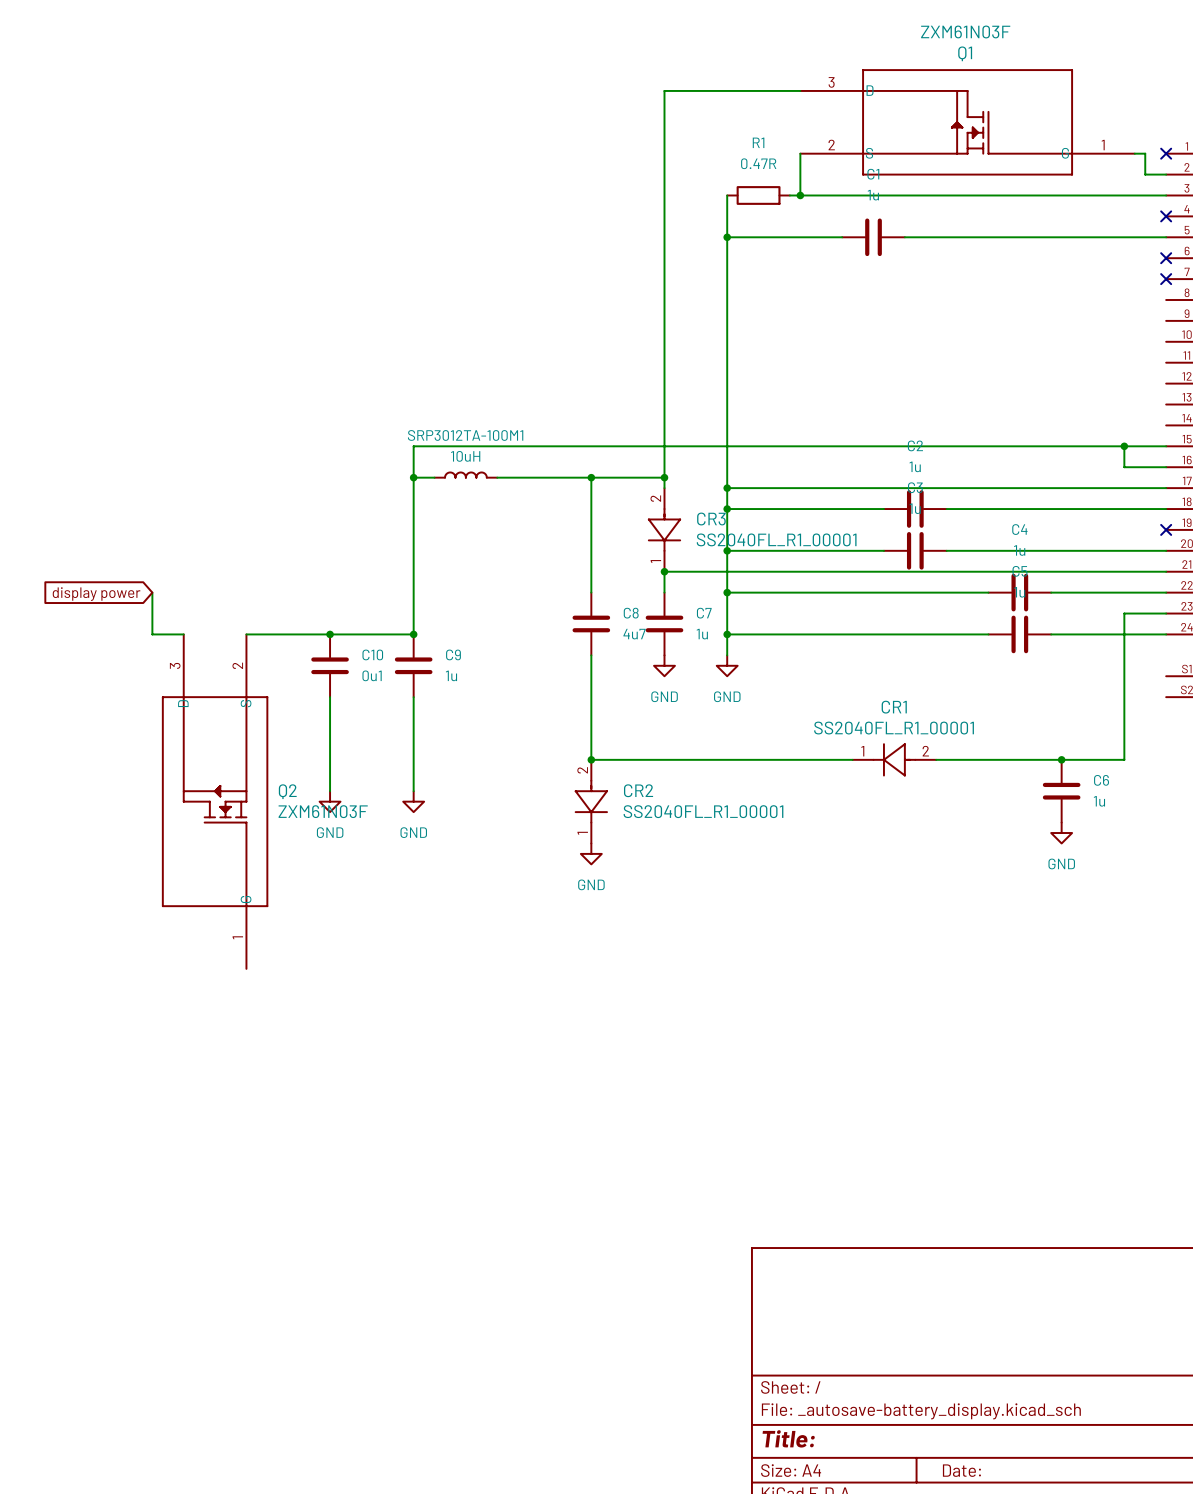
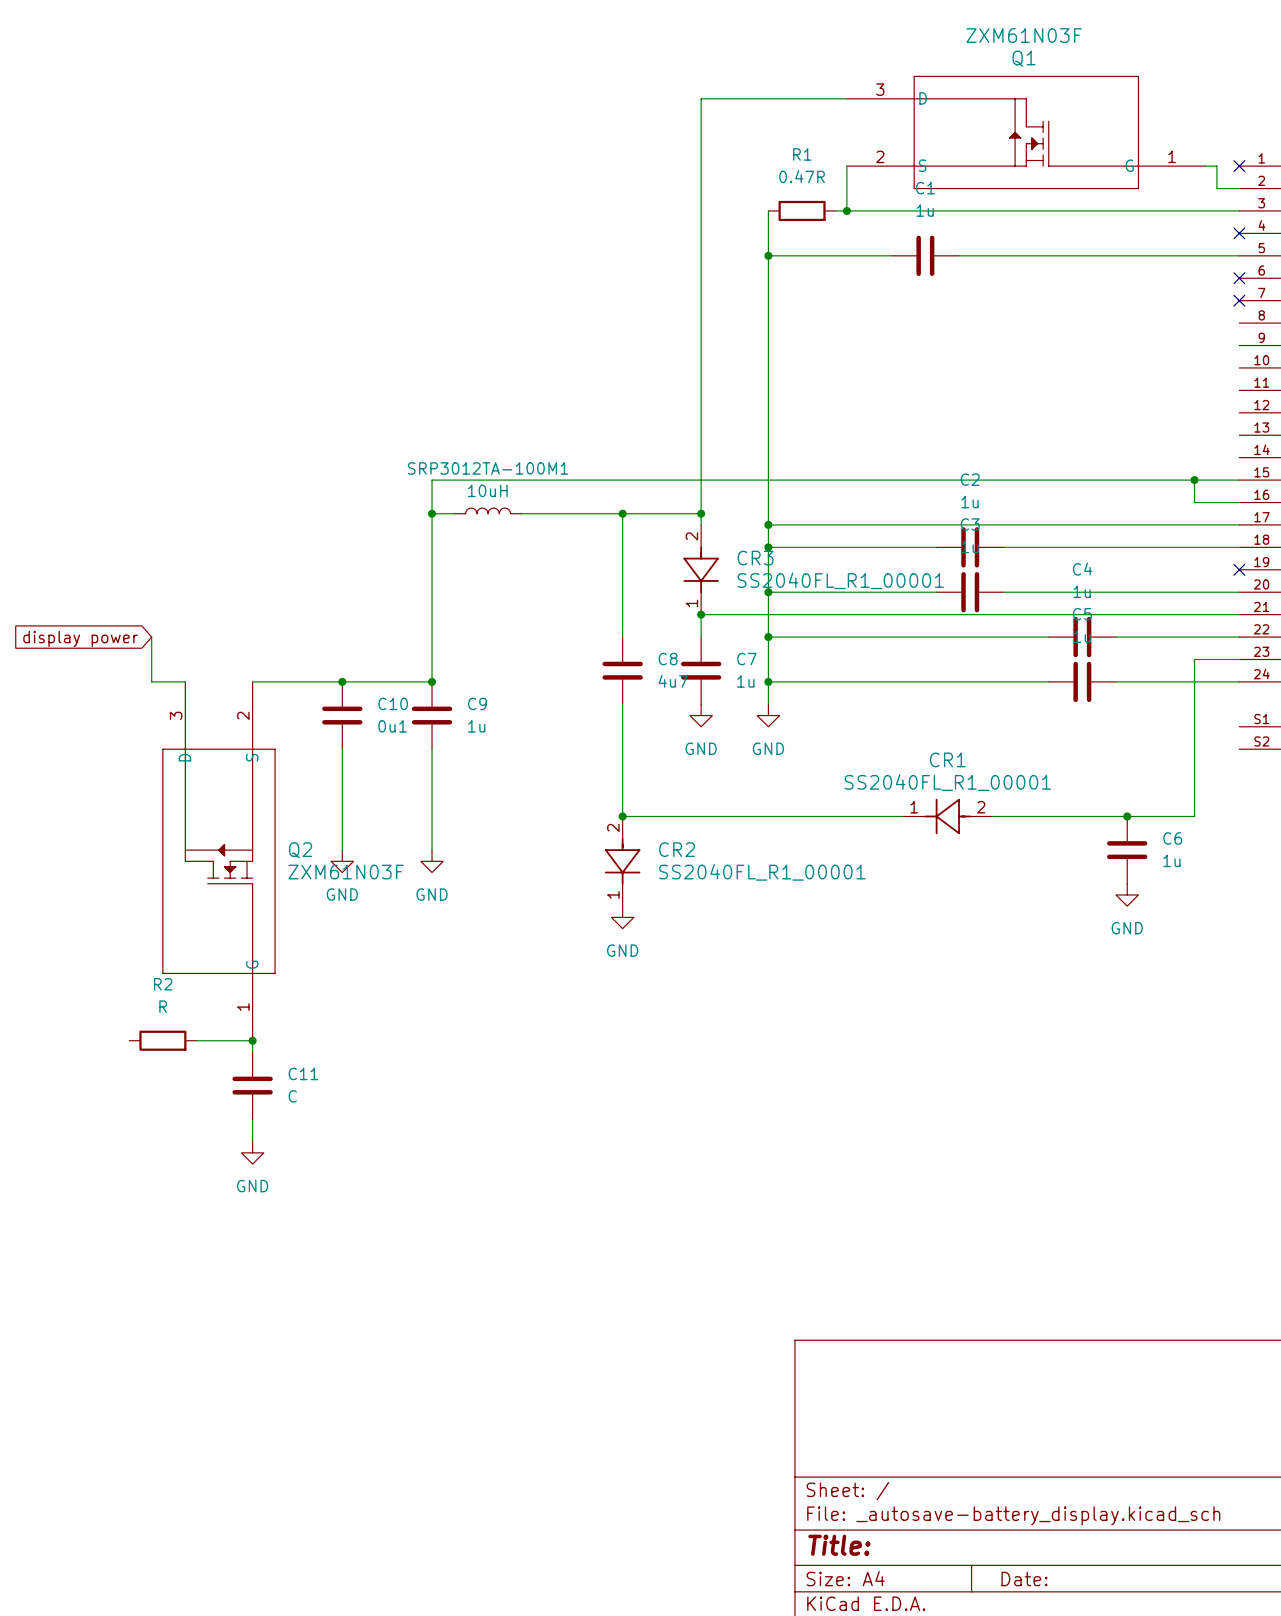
R2: none -> R (162, 1040)
wire: none -> (196, 1040) (252, 1040) (252, 1051)
junction: none -> (252, 1040)
C11: none -> C (252, 1085)
wire: none -> (252, 1119) (252, 1141)
power symbol: none -> GND (252, 1152)

